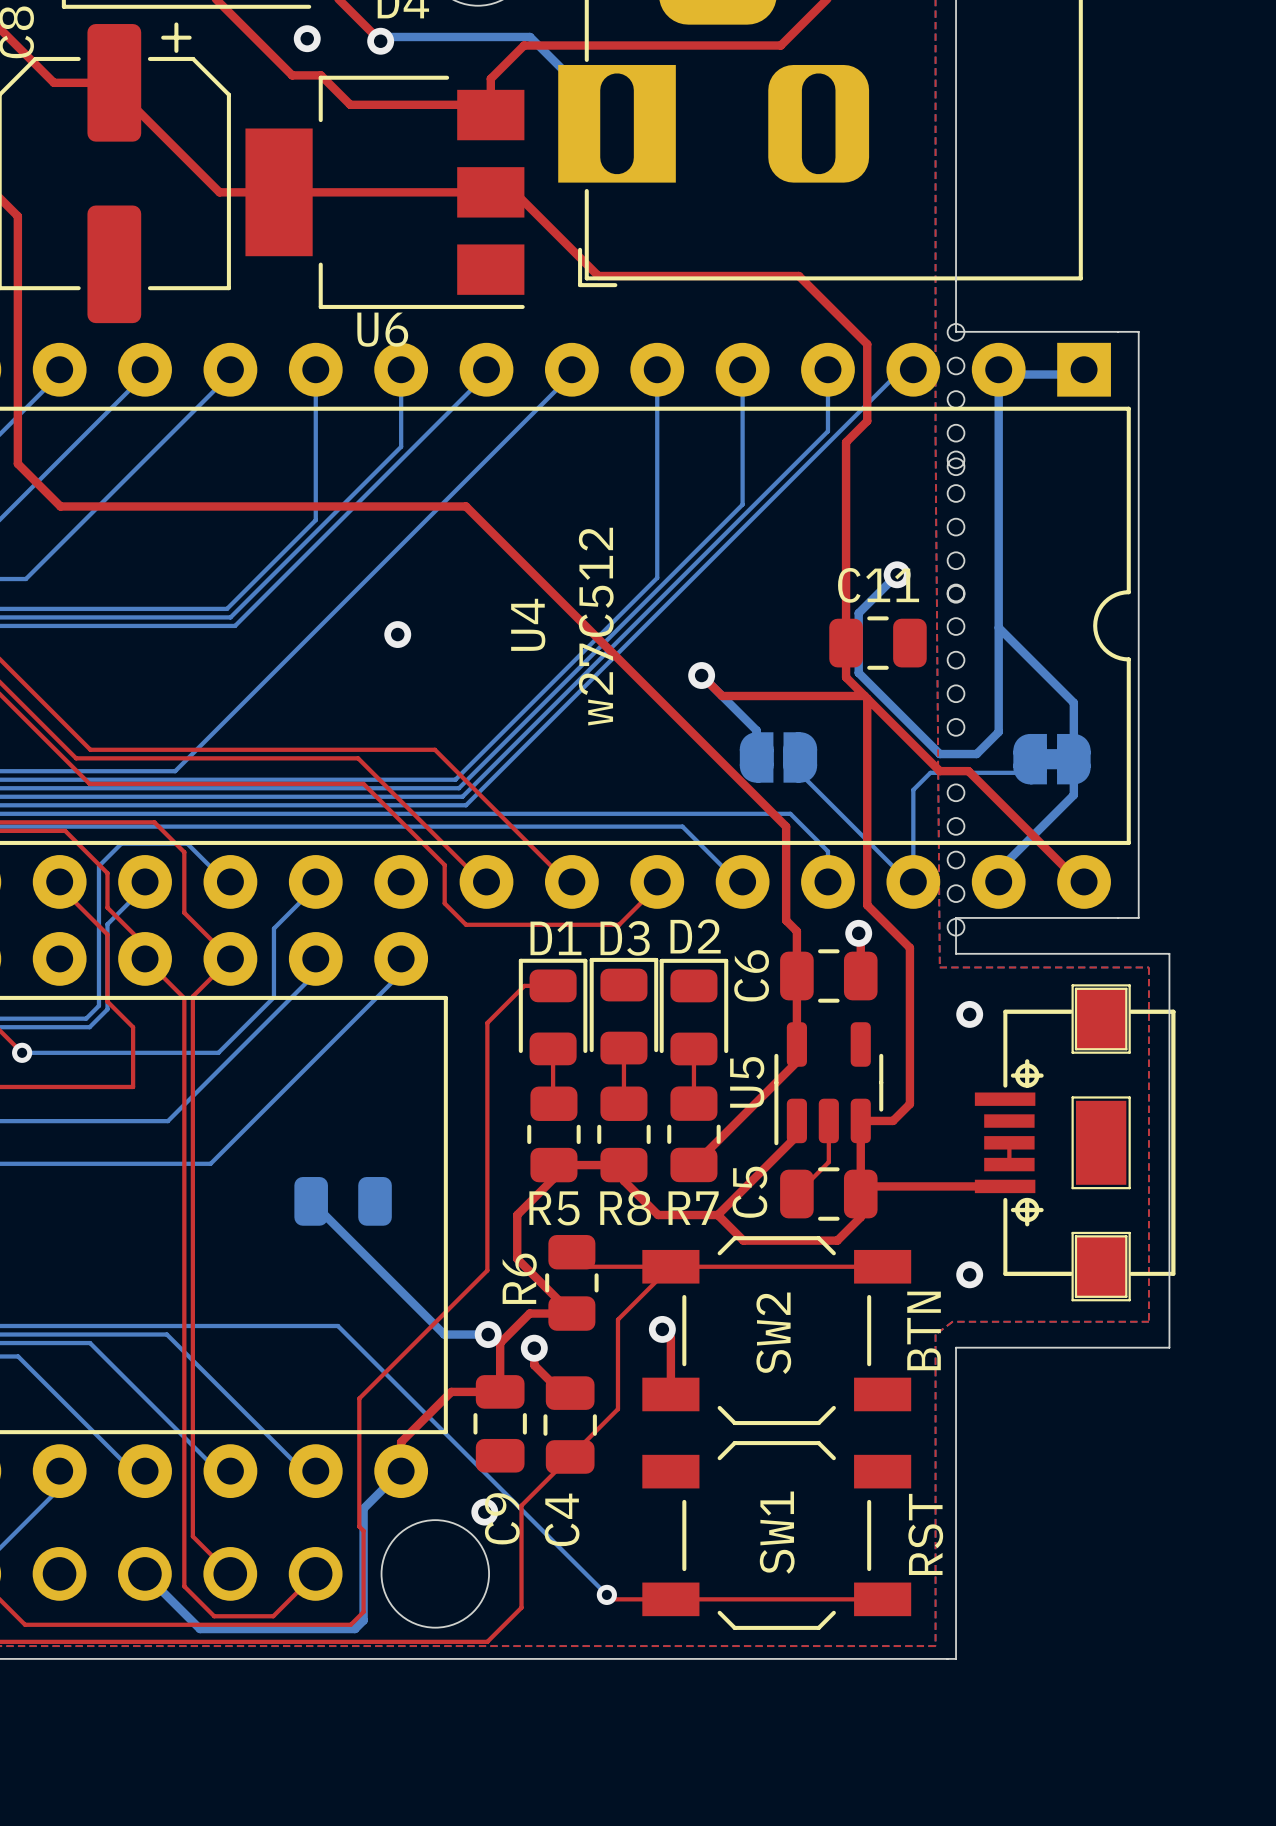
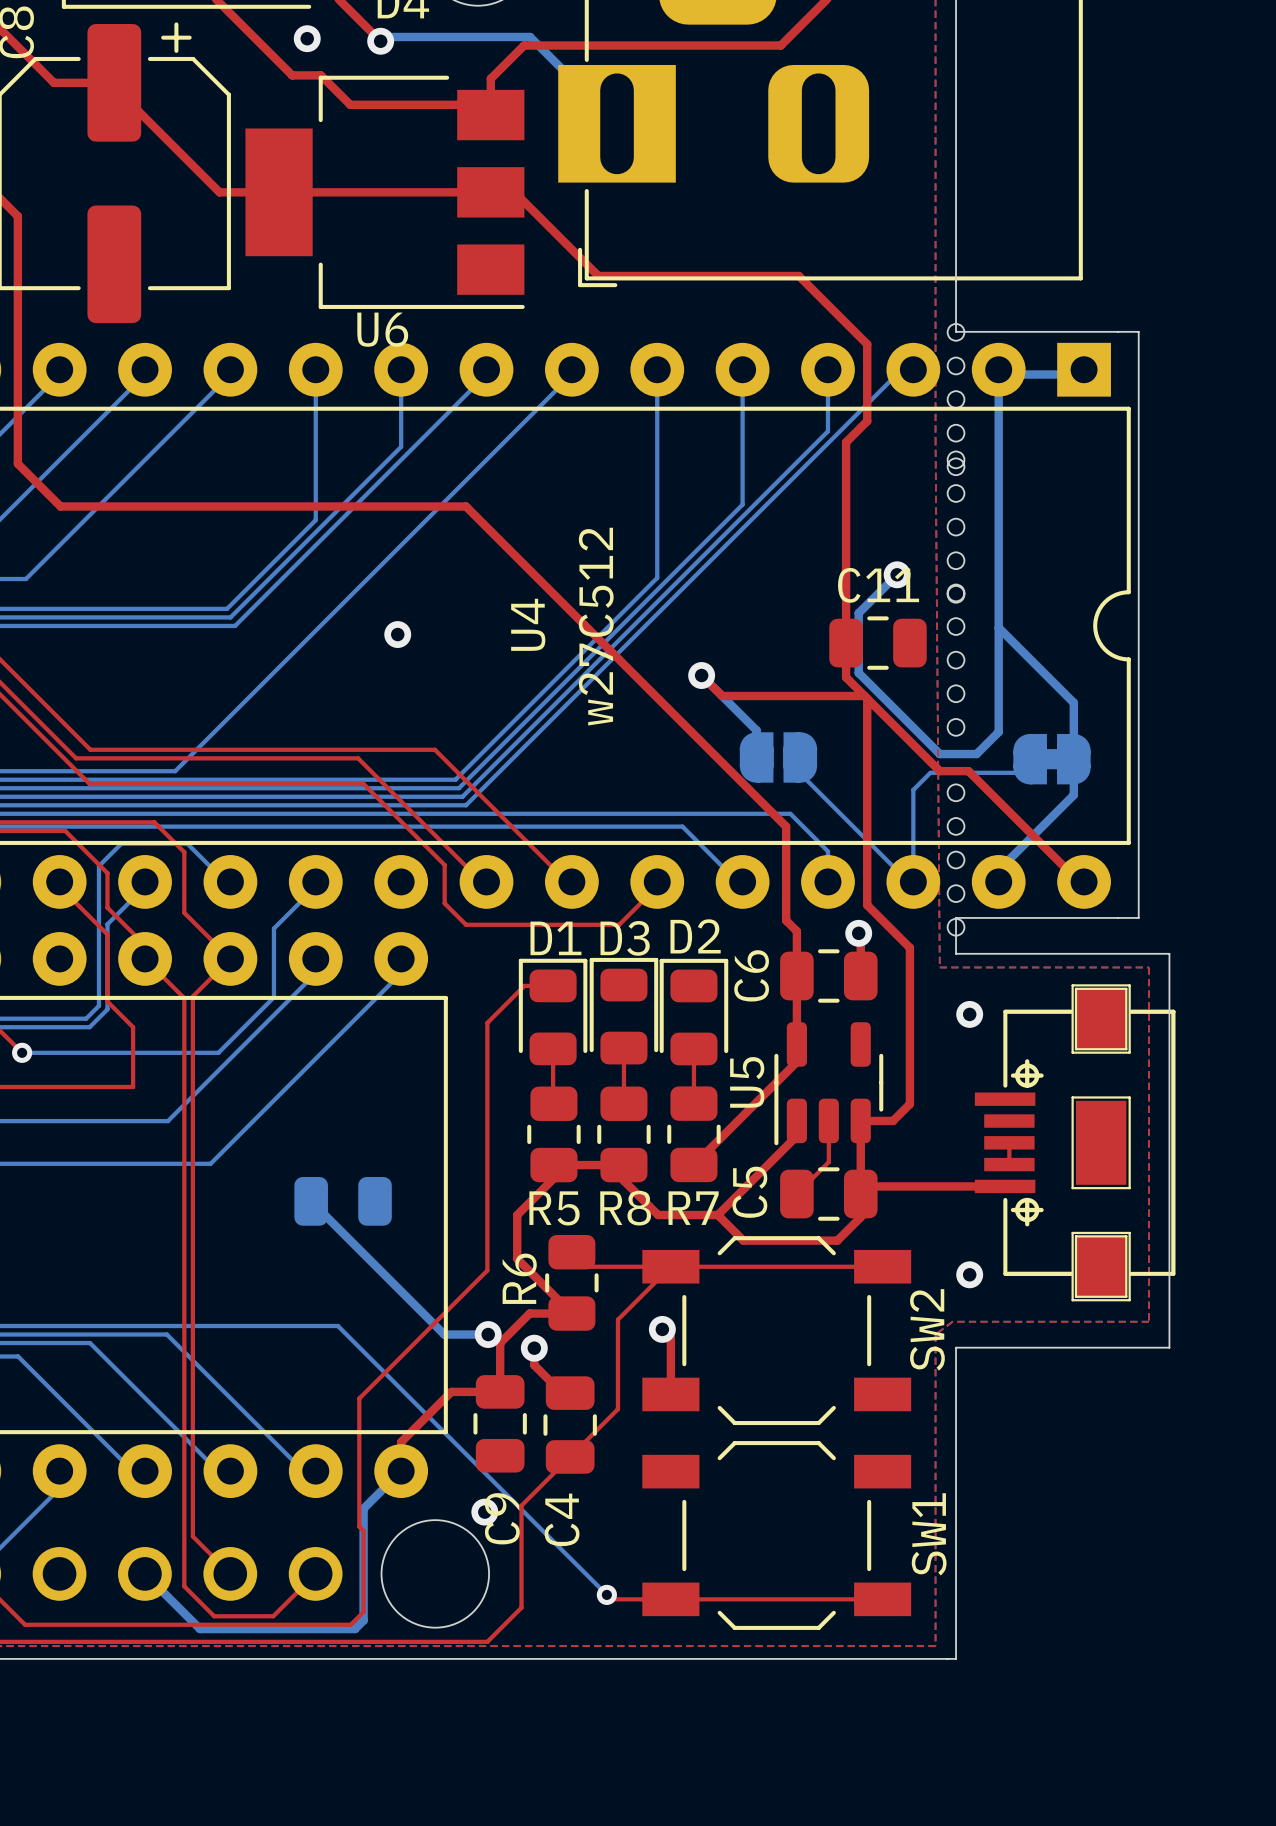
SW2 value: BTN (924, 1330) -> none
SW2 name position: SW2 (773, 1333) -> SW2 (927, 1329)
SW1 name position: SW1 (777, 1532) -> SW1 (929, 1534)
SW1 value: RST (925, 1534) -> none

